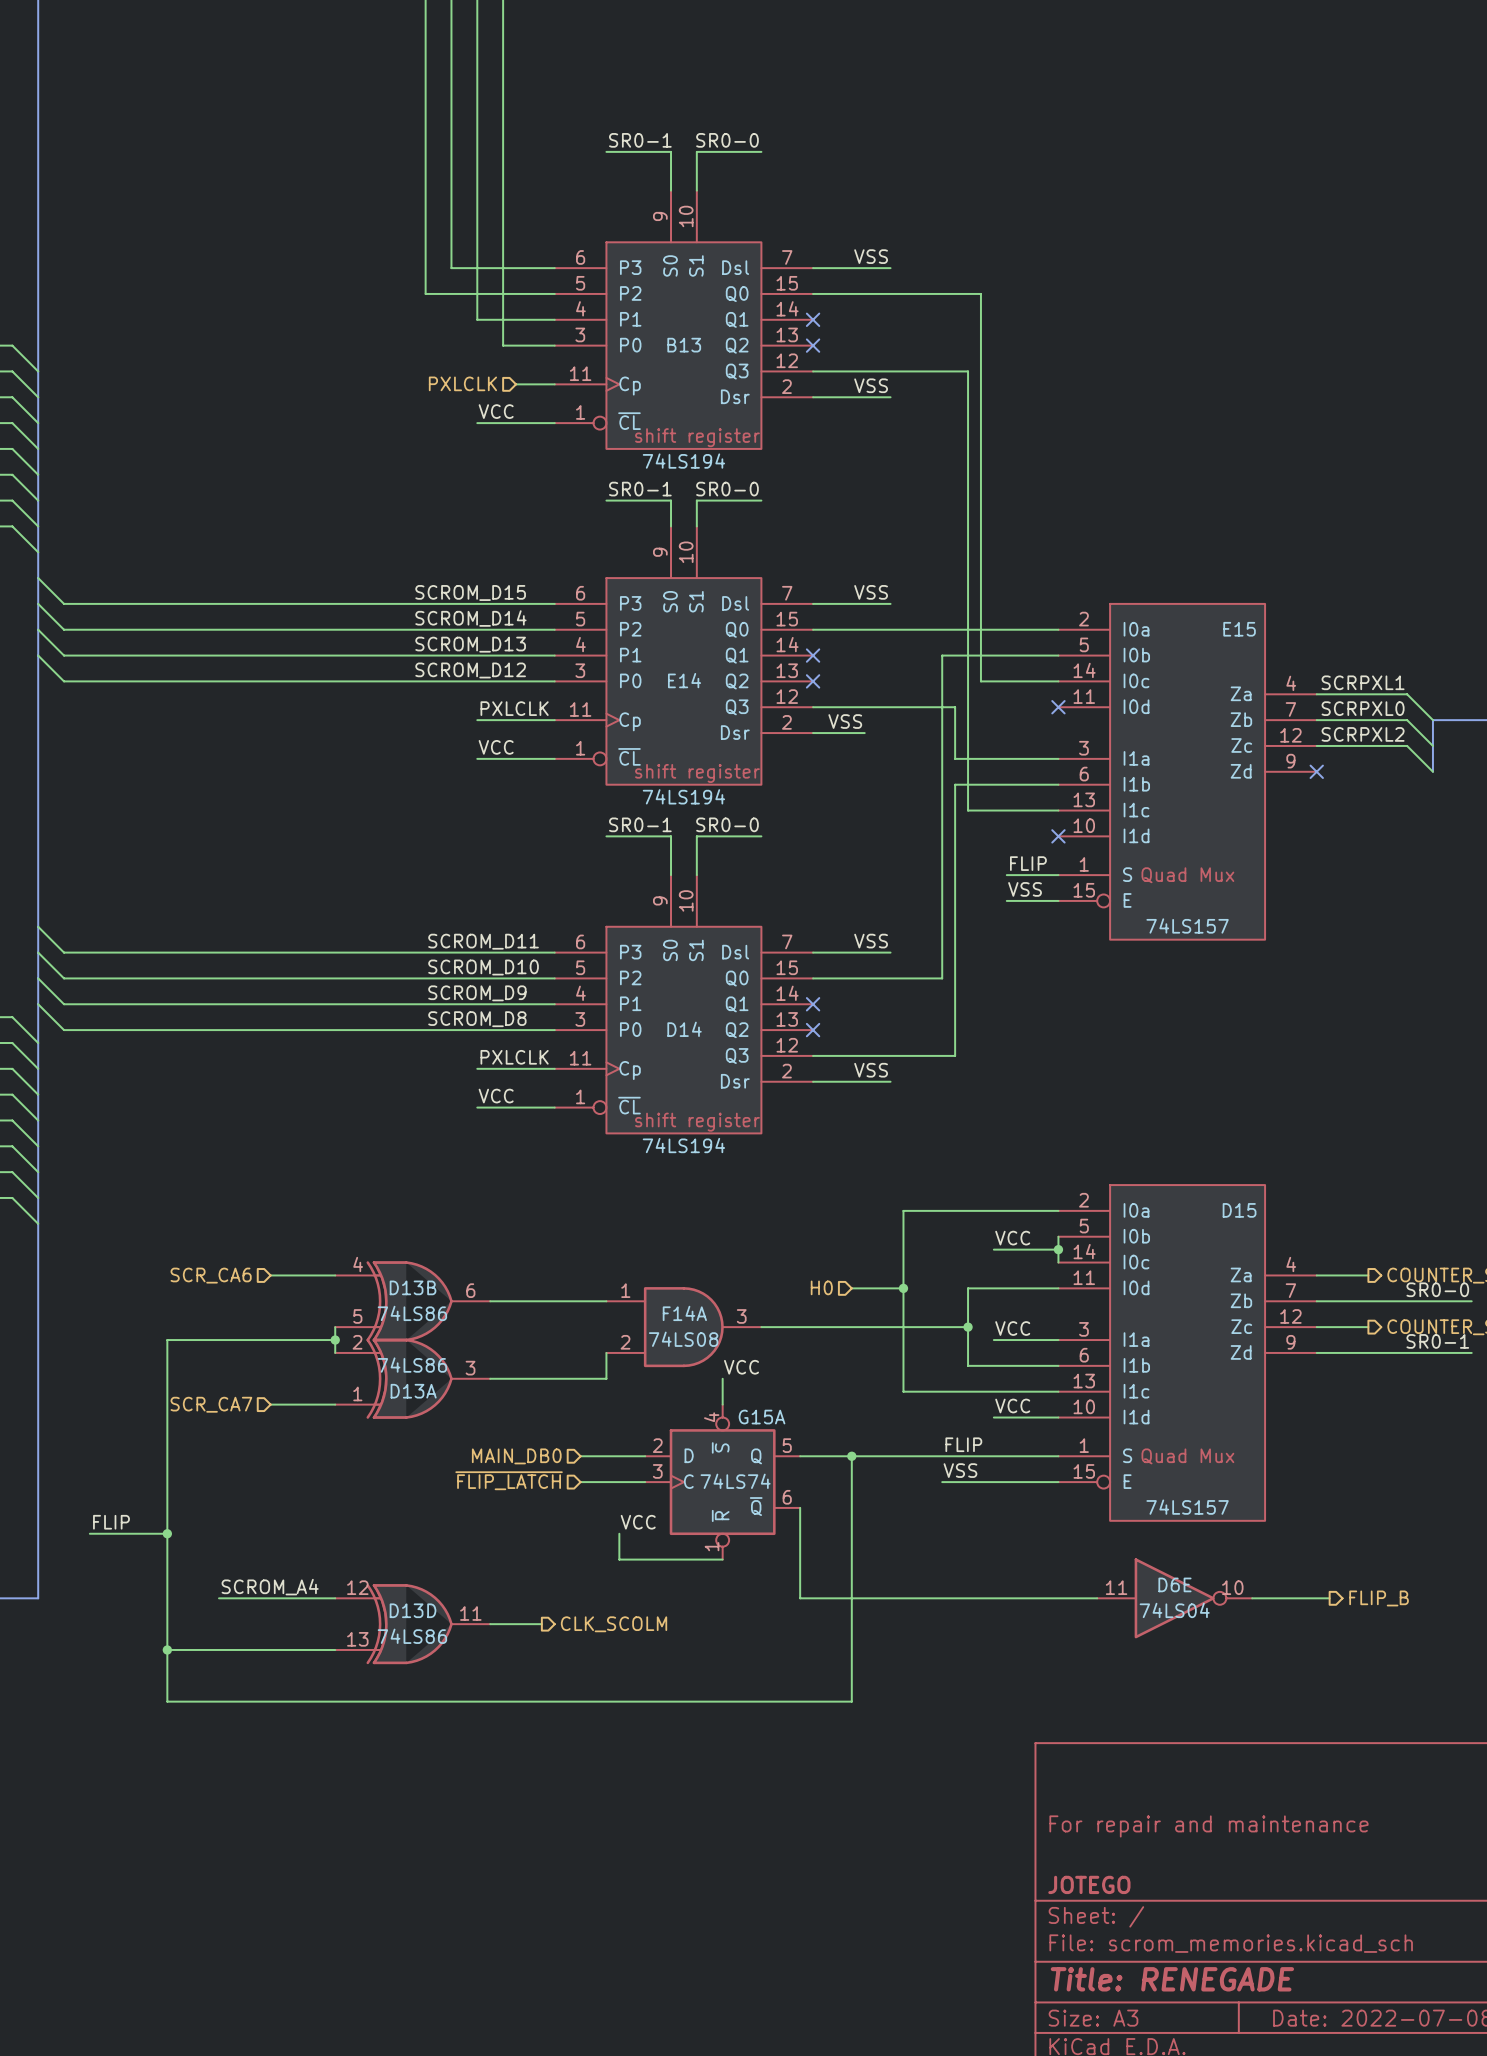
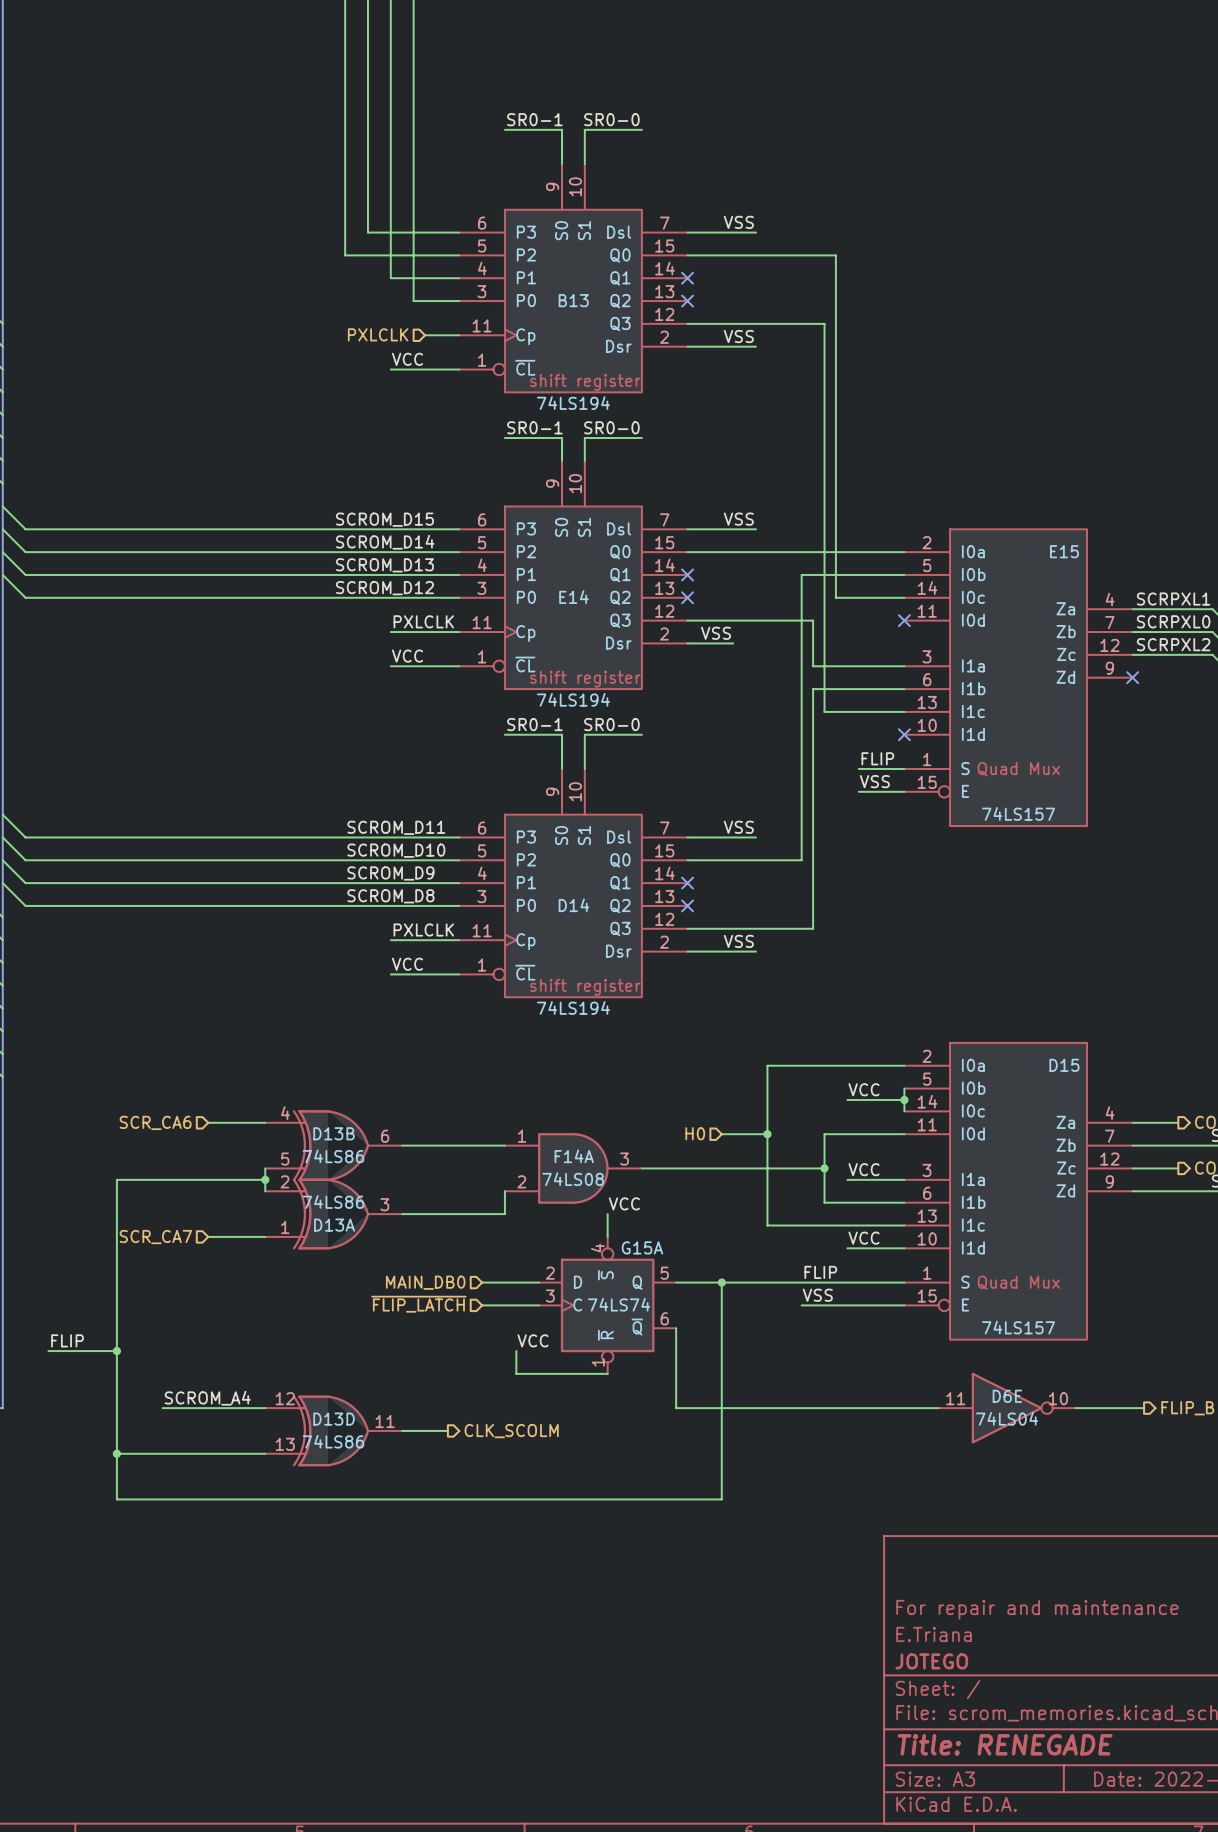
title block: none -> E.Triana (934, 1634)

